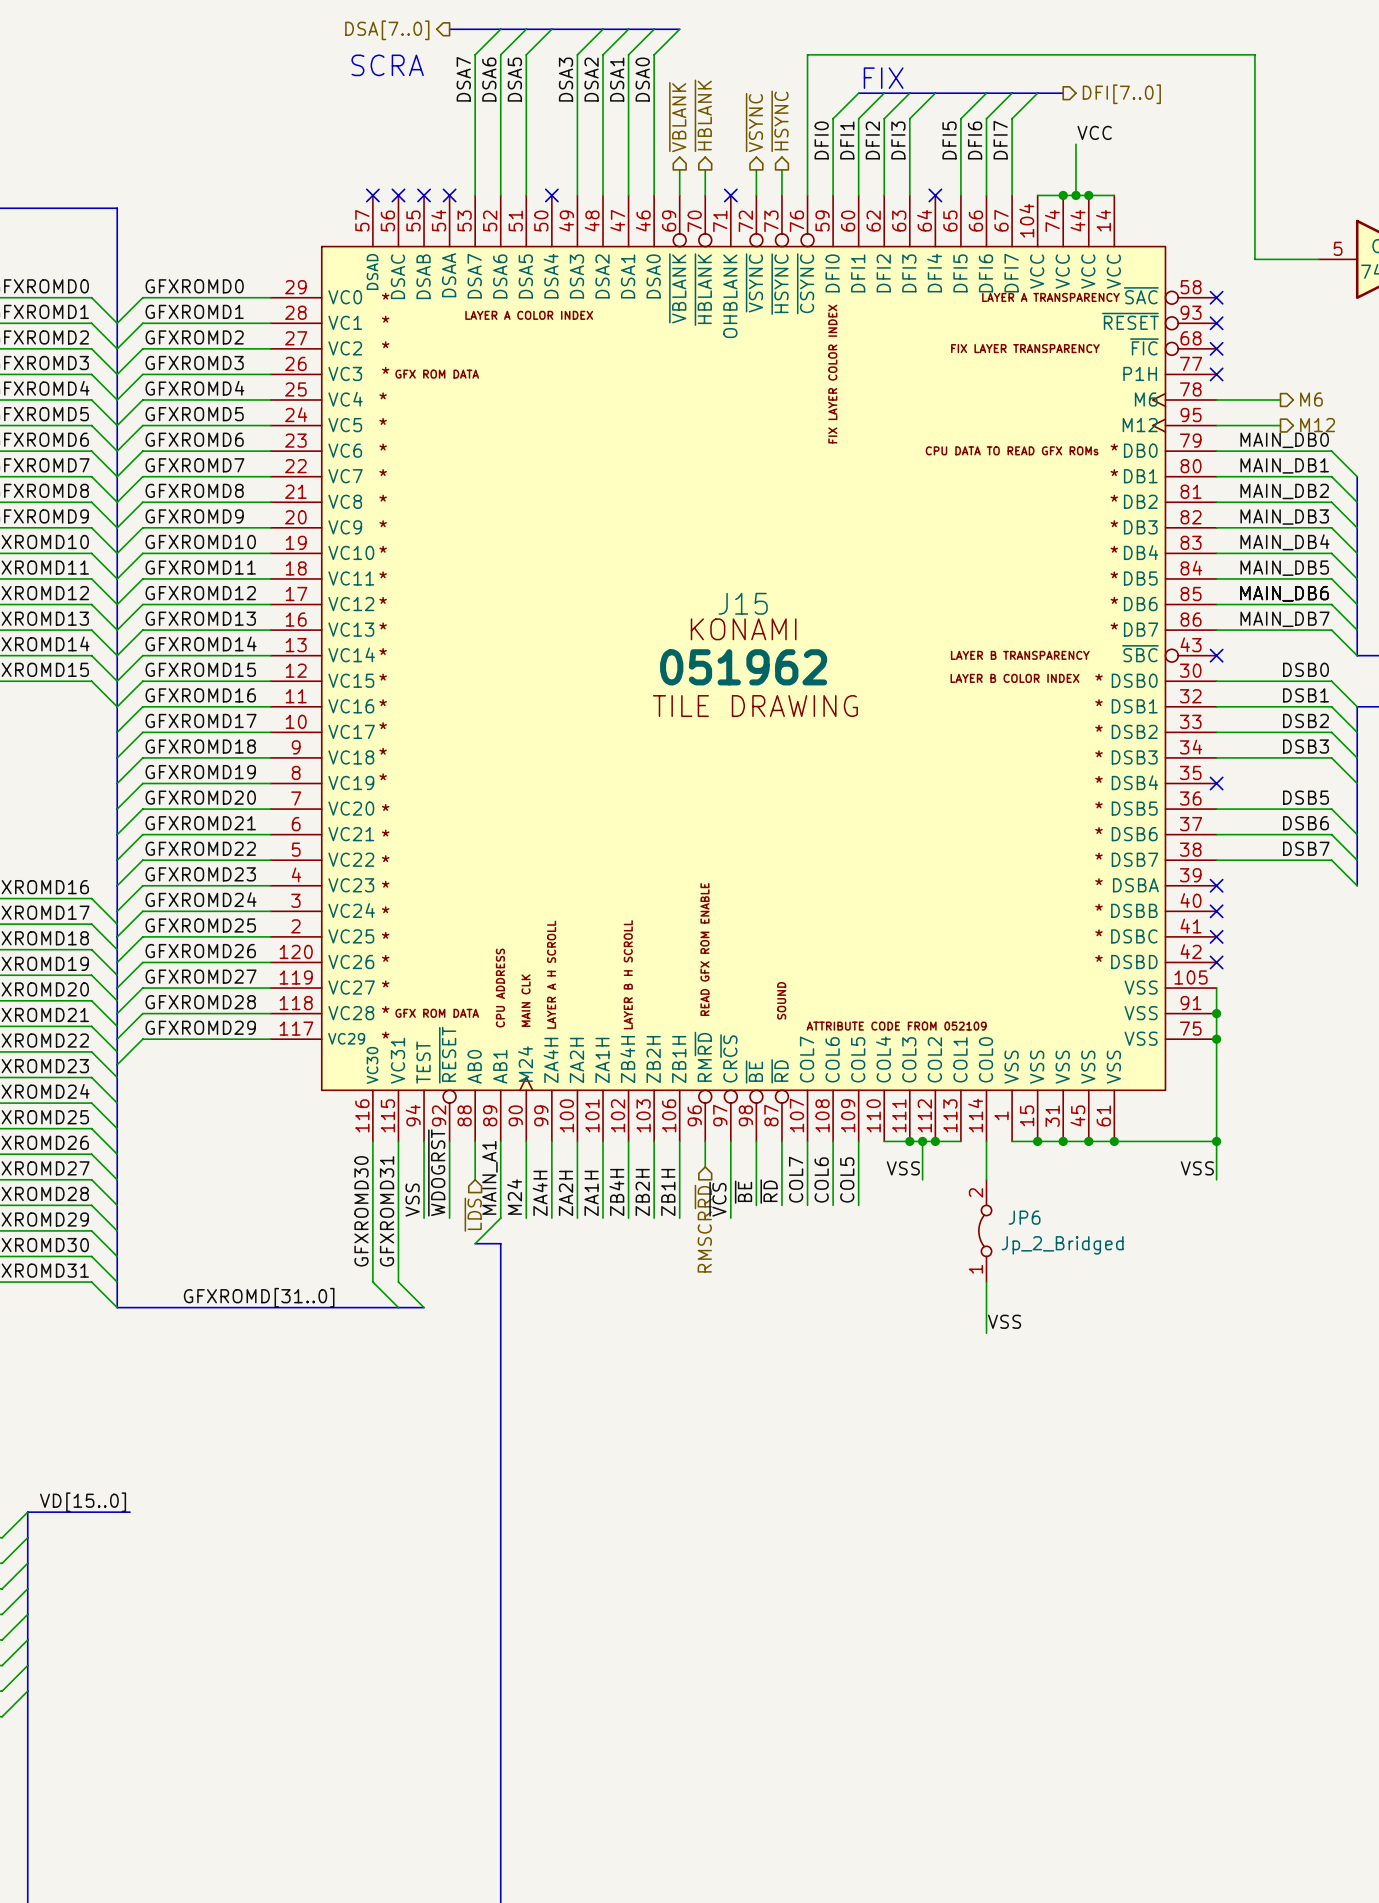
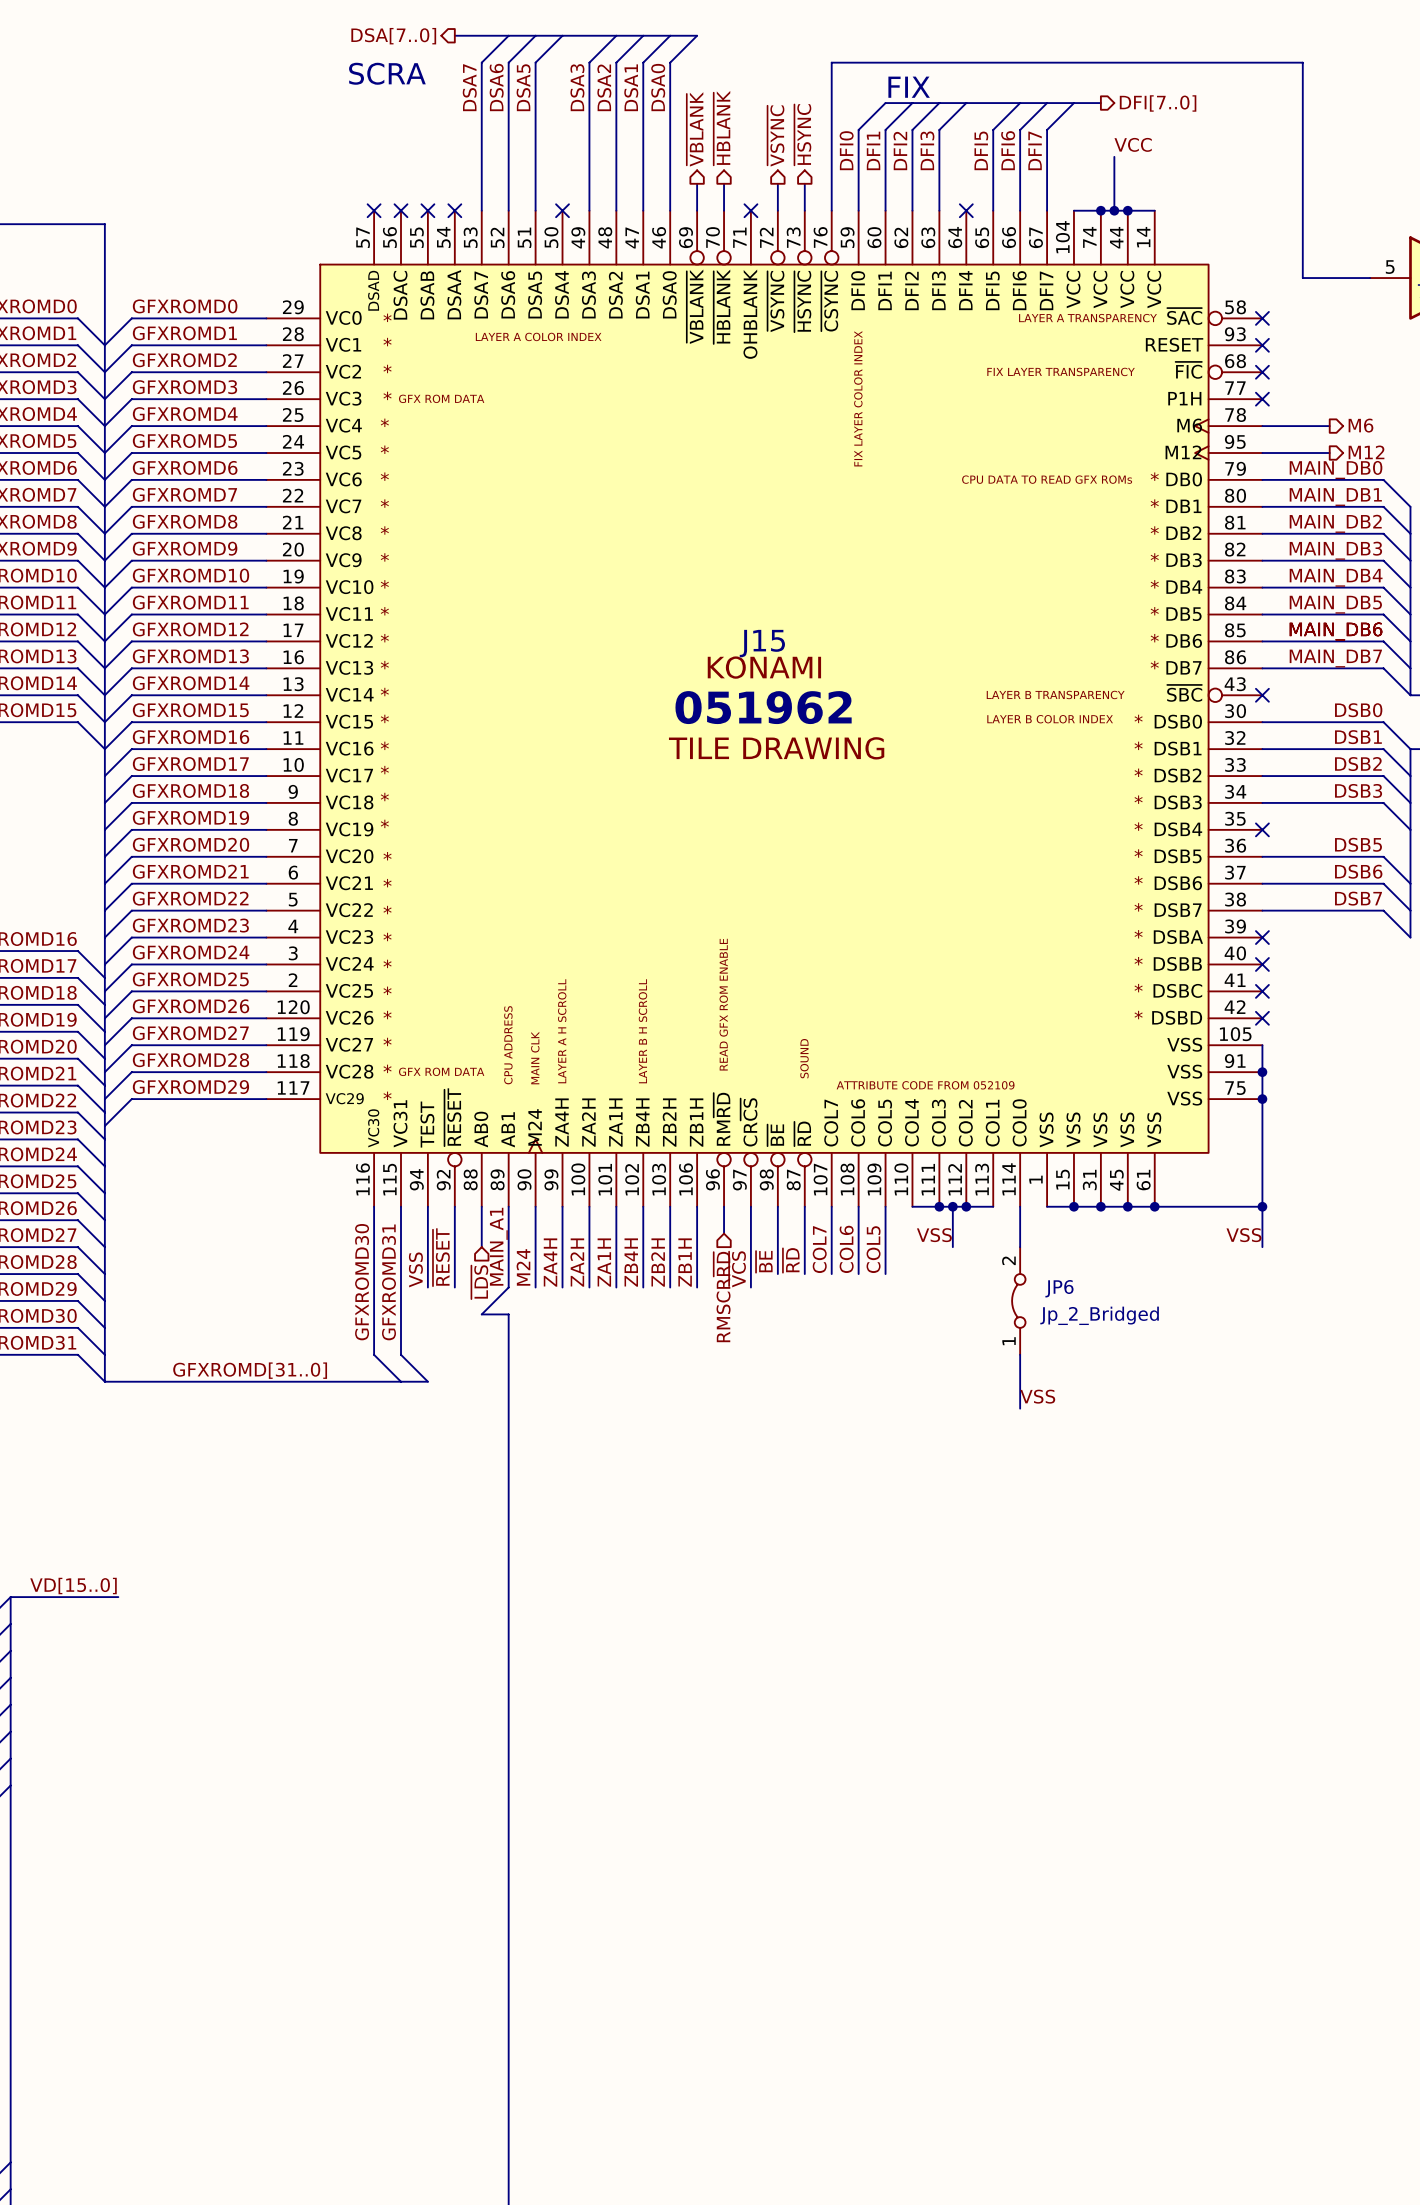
J15 symbol: [270, 195, 1217, 1142] -> [266, 210, 1263, 1207]
label: ~{WDOGRST} (436, 1172) -> ~{RESET} (441, 1257)

